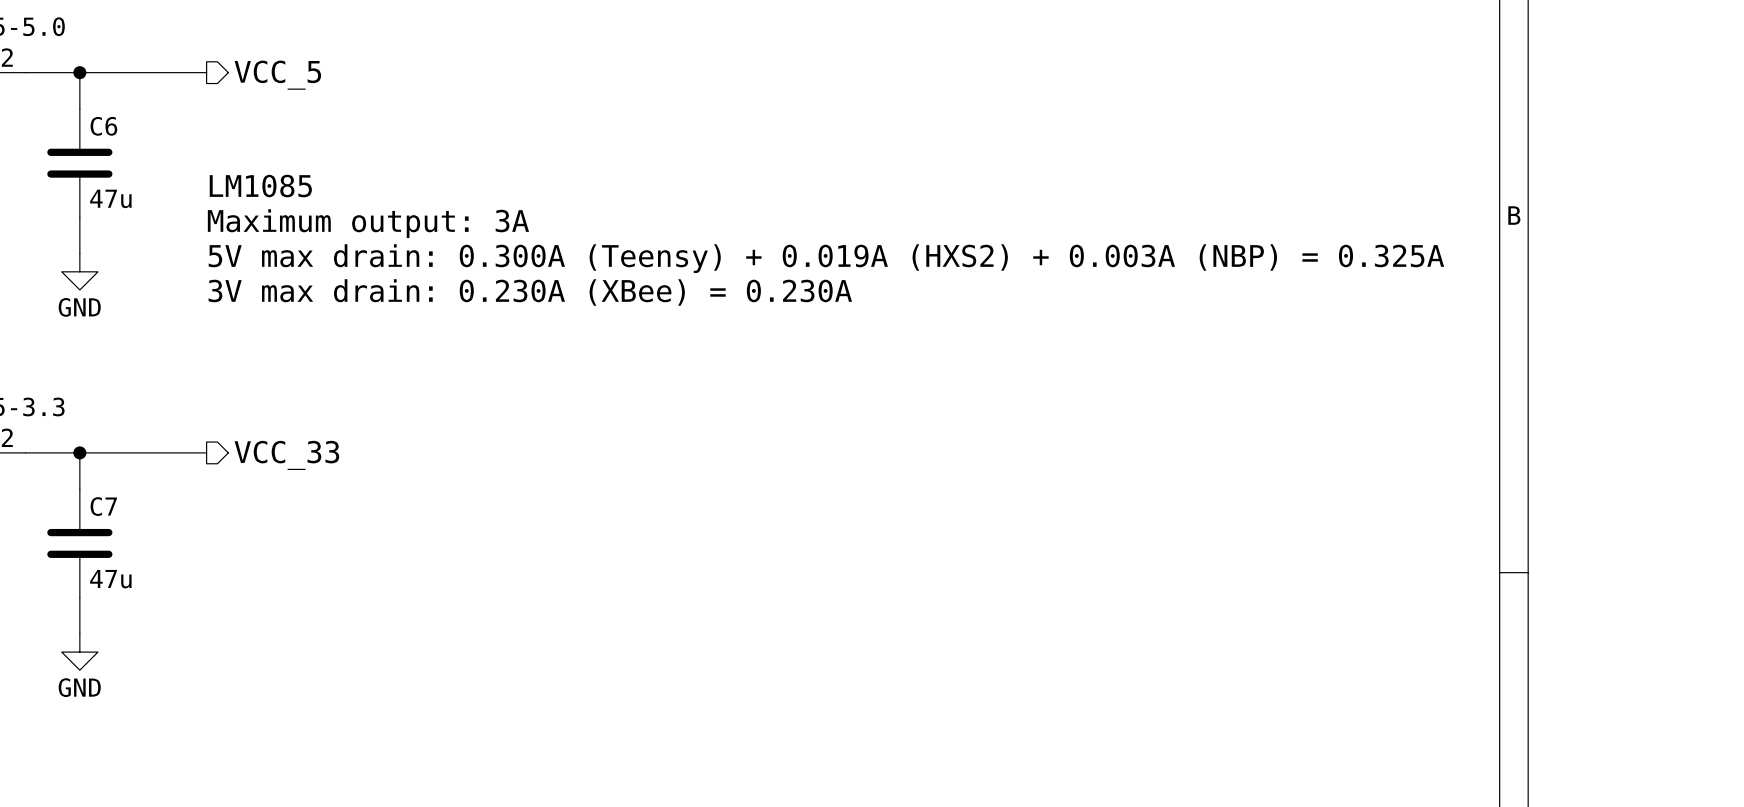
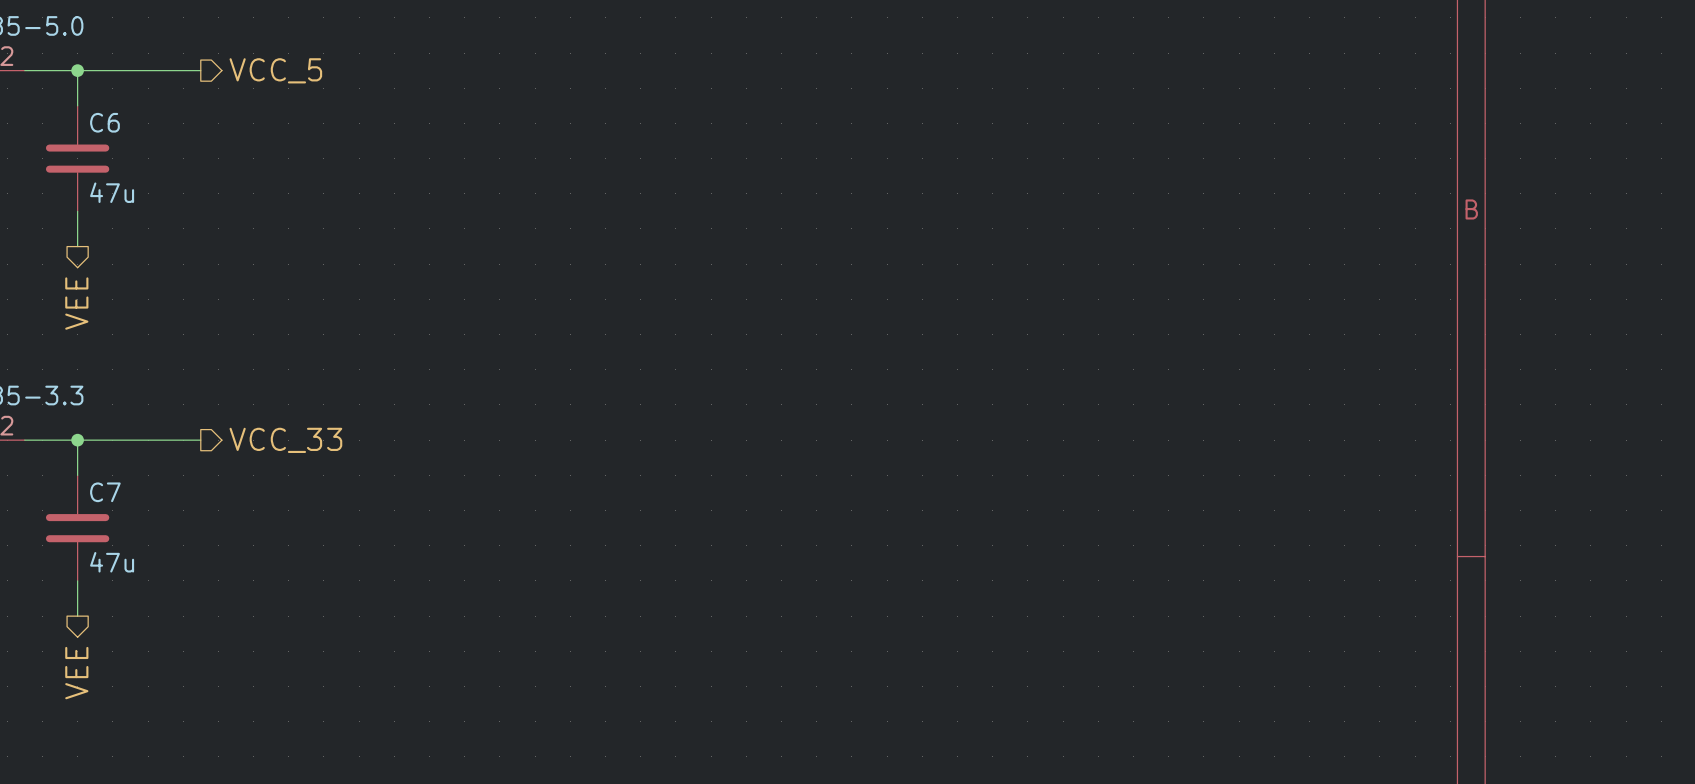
text: LM1085 (260, 186) -> none
text: Maximum output: 3A (368, 223) -> none
text: 5V max drain: 0.300A (Teensy) + 0.019A (HXS2) + 0.003A (NBP) = 0.325A (826, 258) -> none
power symbol: GND (79, 271) -> none
text: 3V max drain: 0.230A (XBee) = 0.230A (530, 292) -> none
hierarchical label: none -> VEE (76, 303)
power symbol: GND (79, 652) -> none
hierarchical label: none -> VEE (76, 673)

